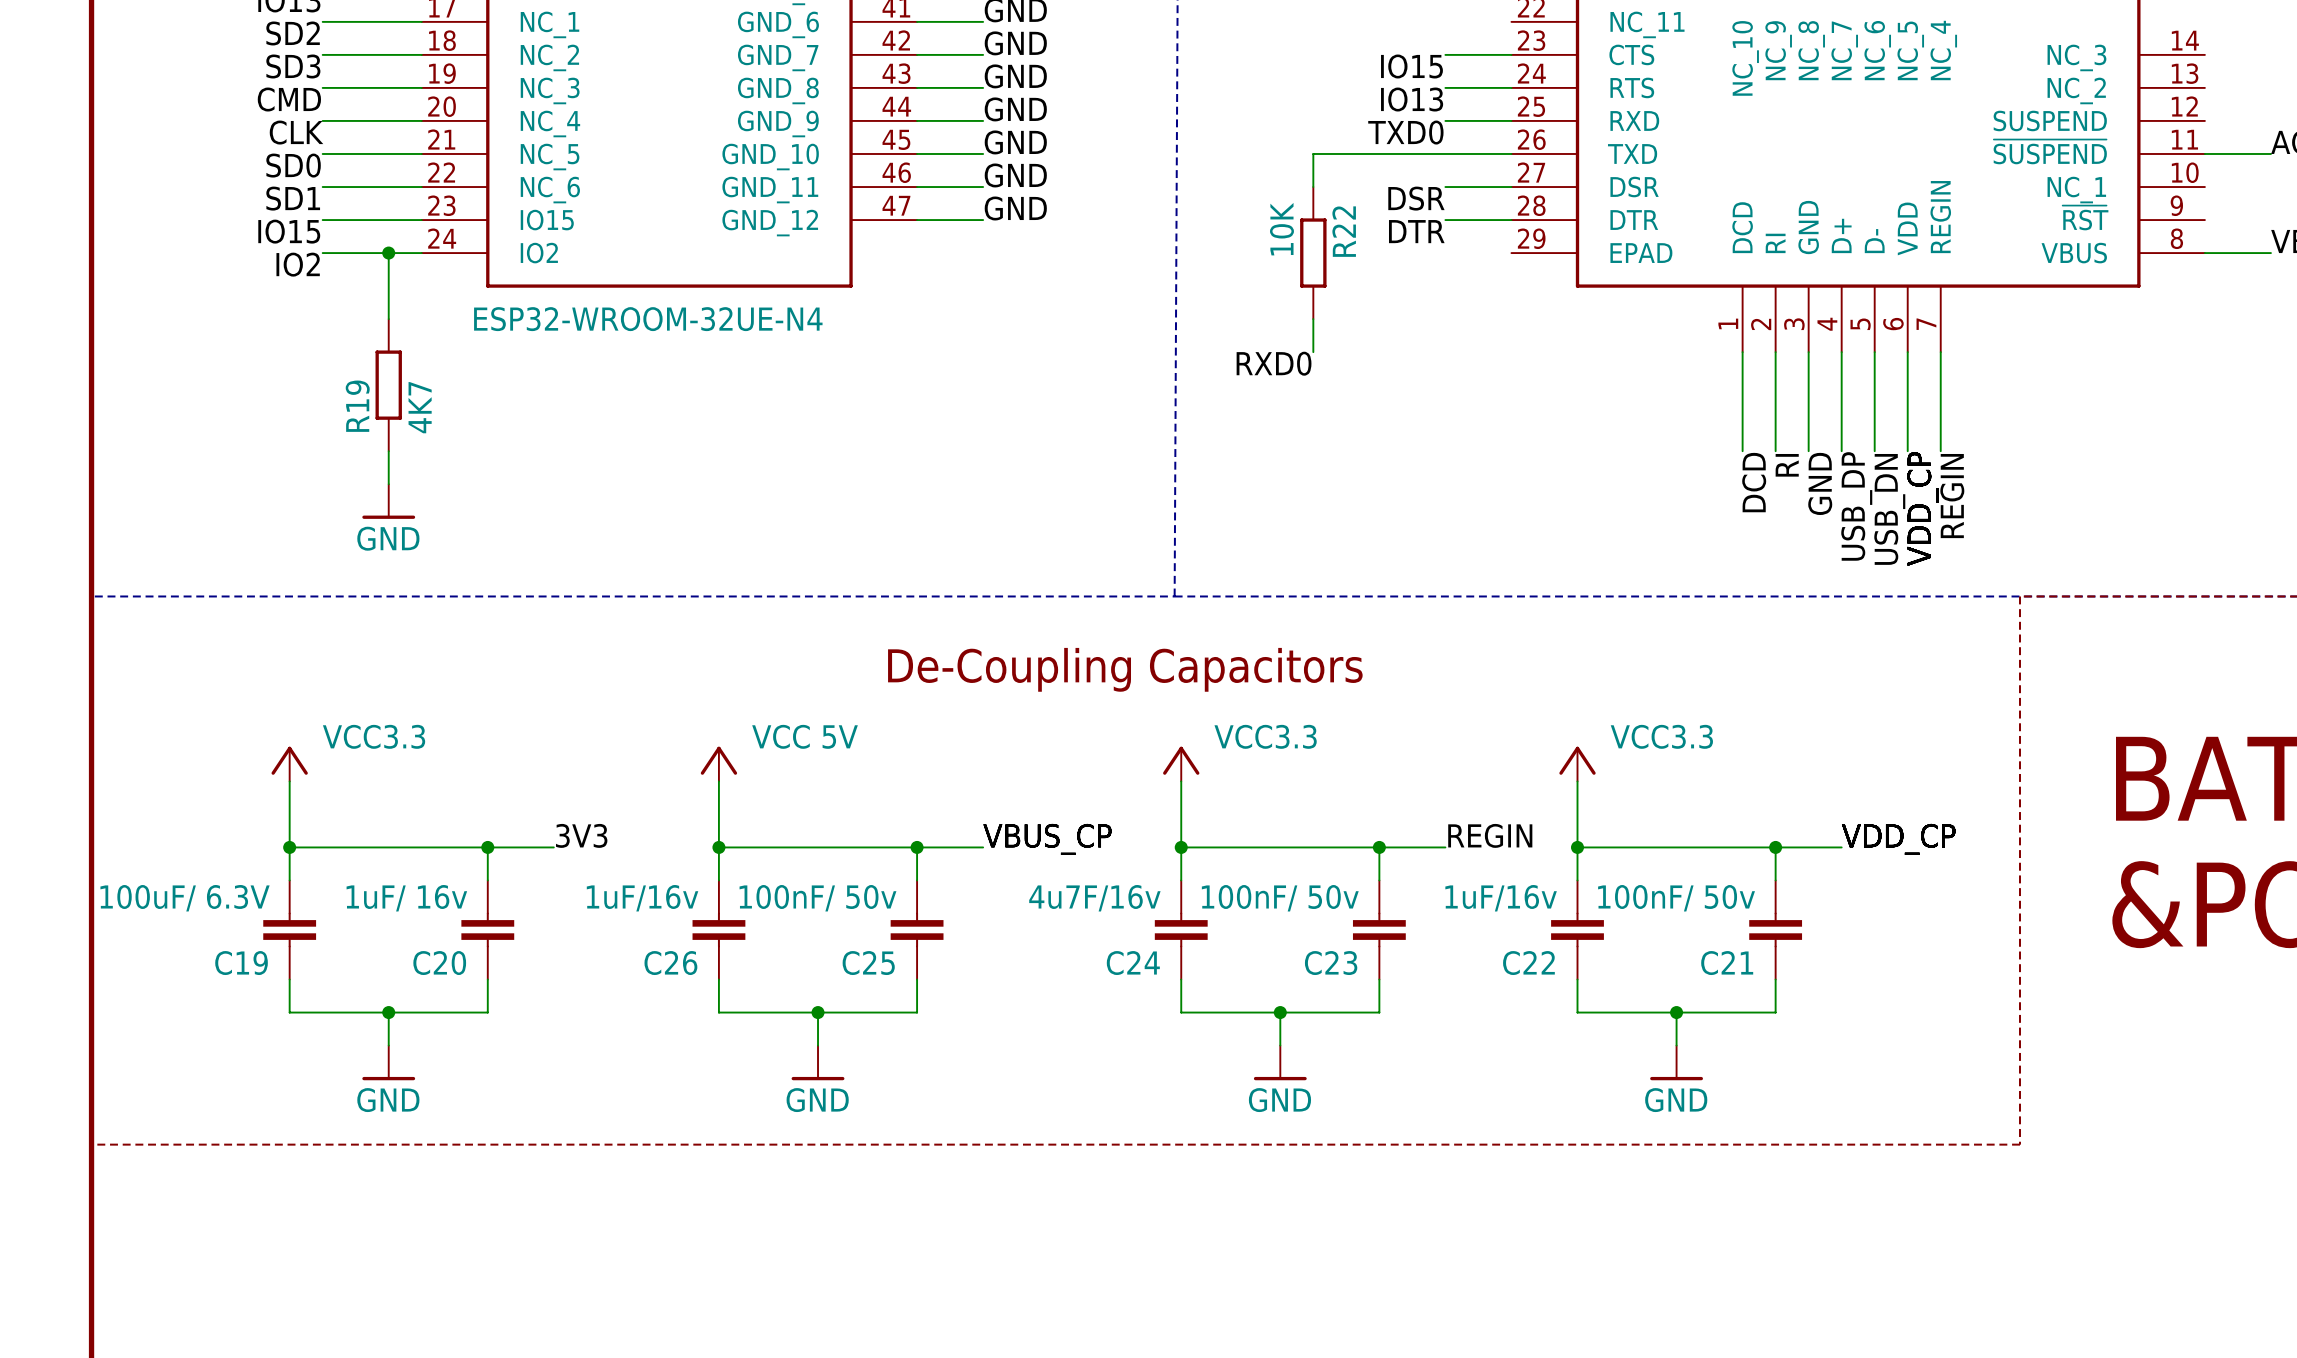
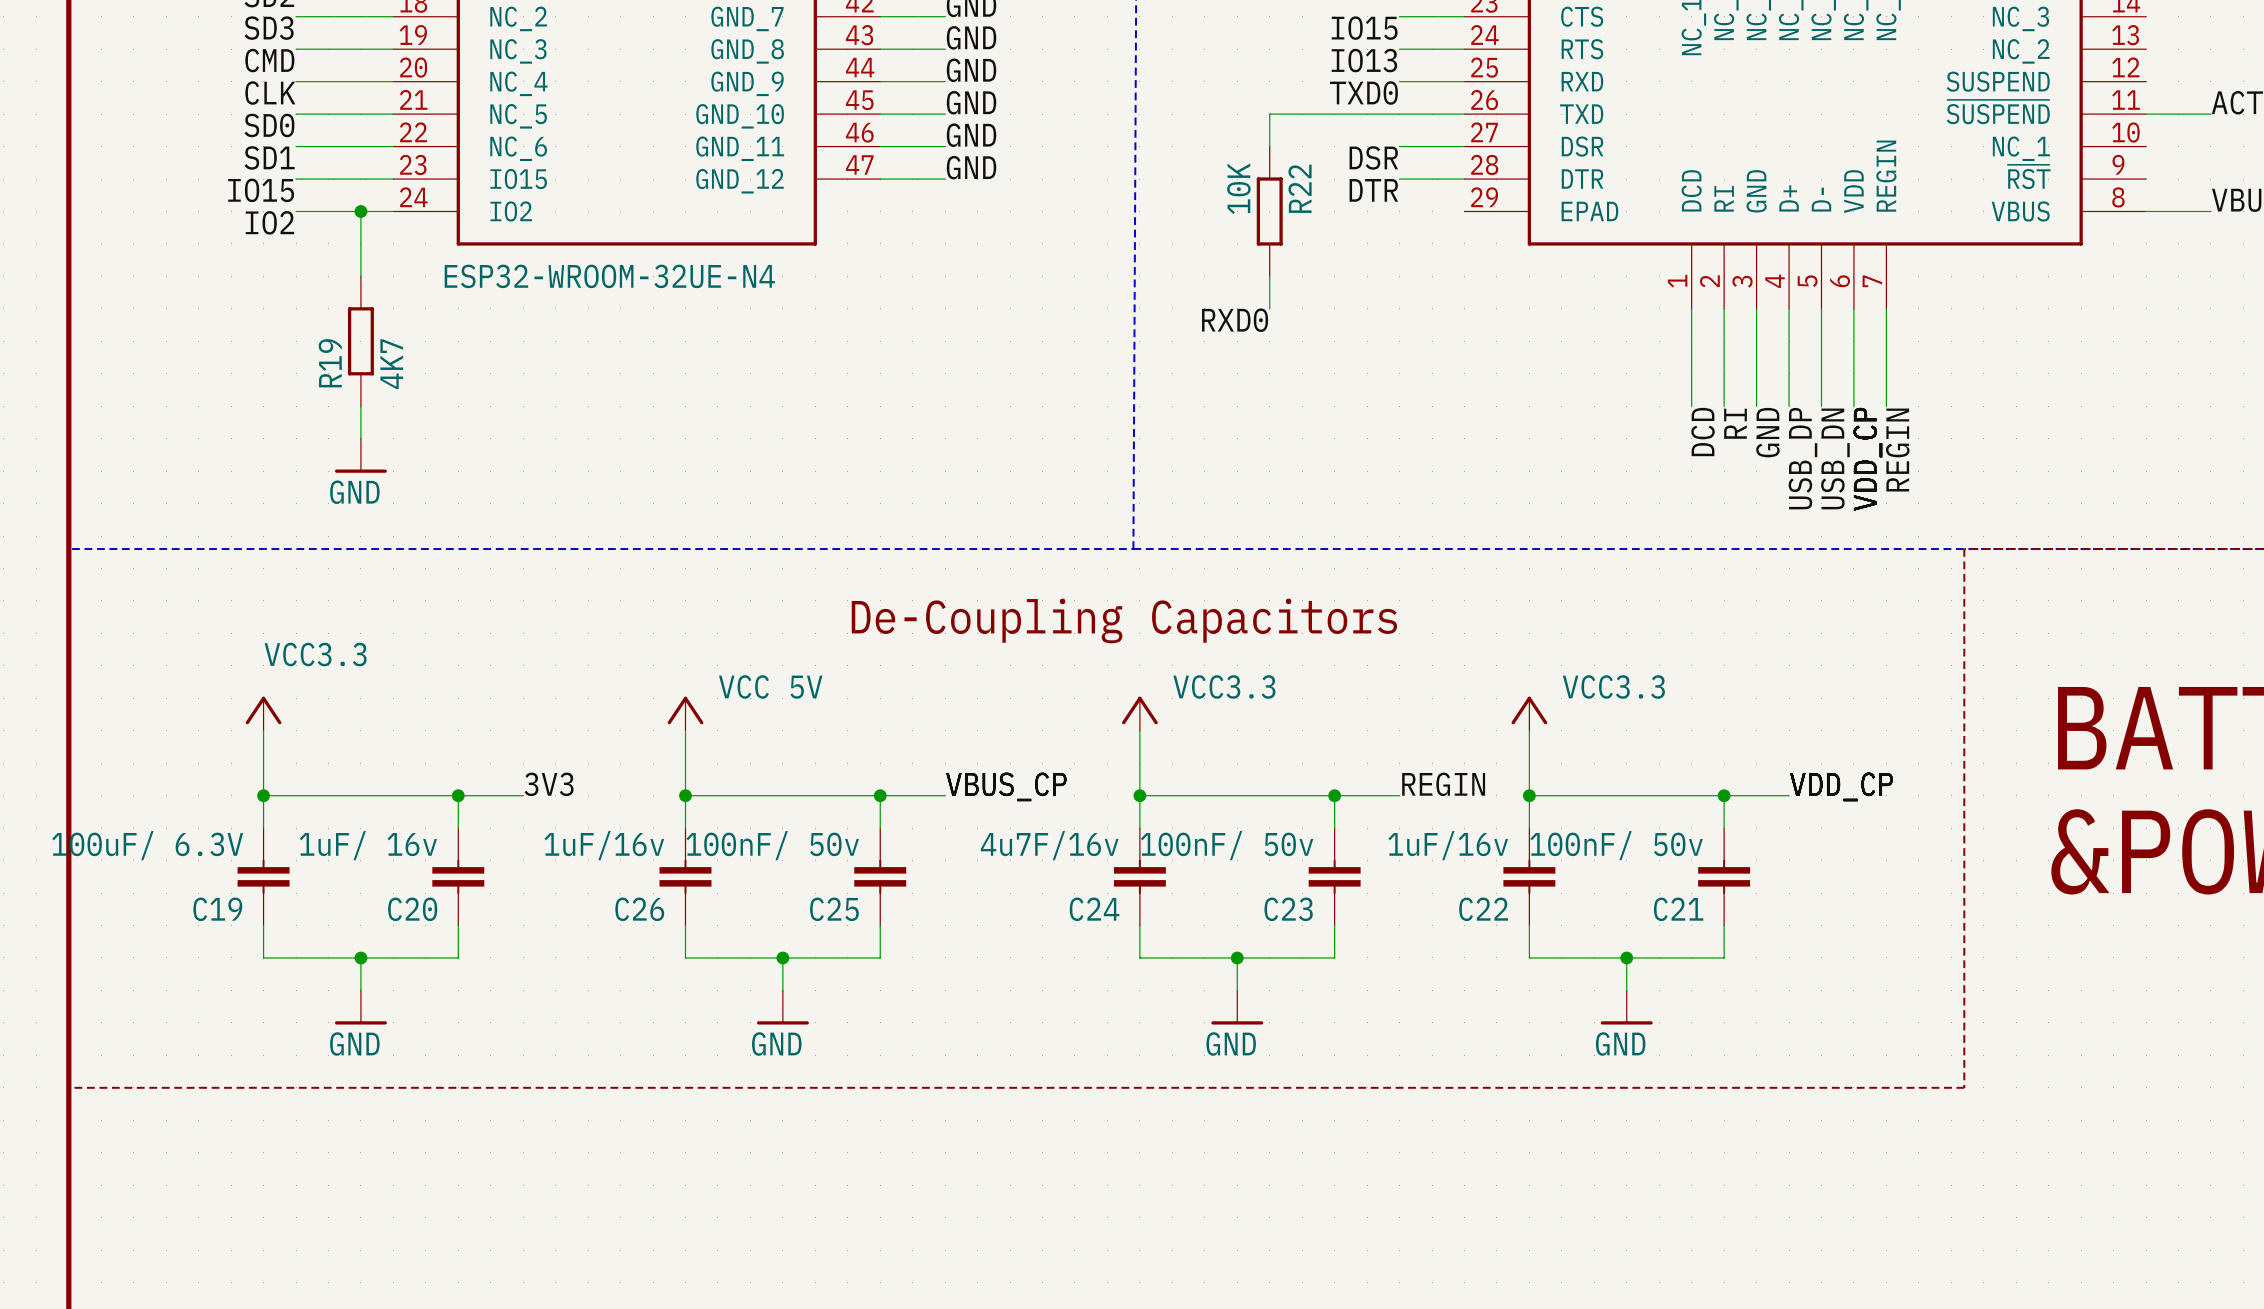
power symbol text position: VCC3.3 (374, 736) -> VCC3.3 (315, 654)

